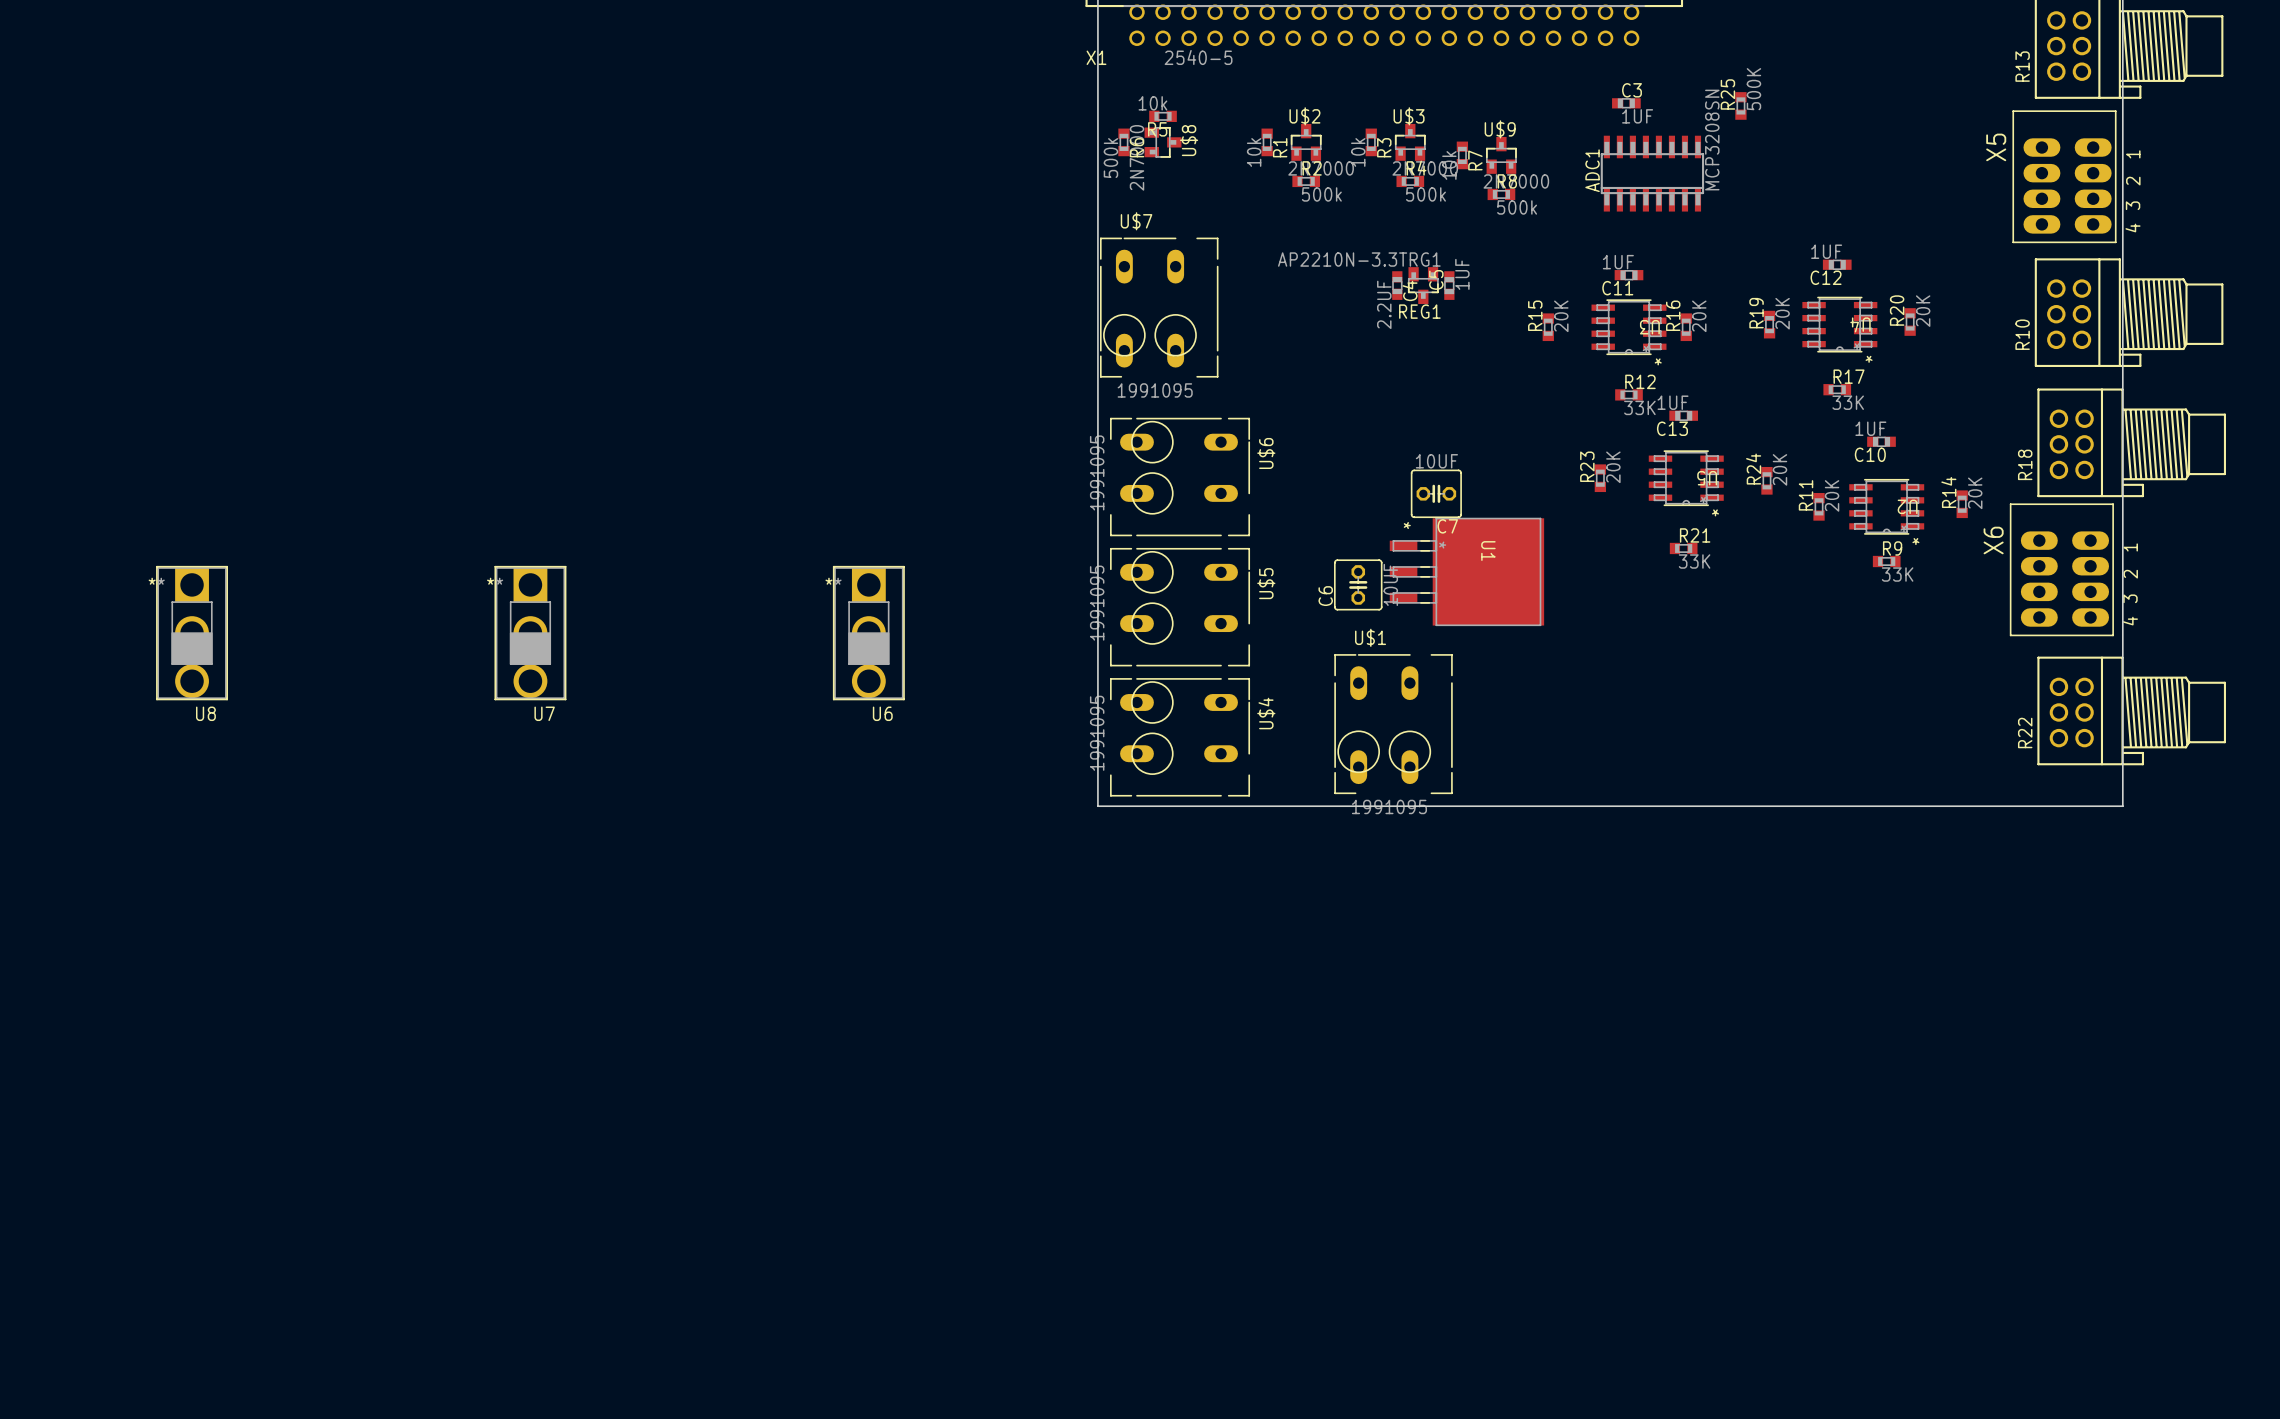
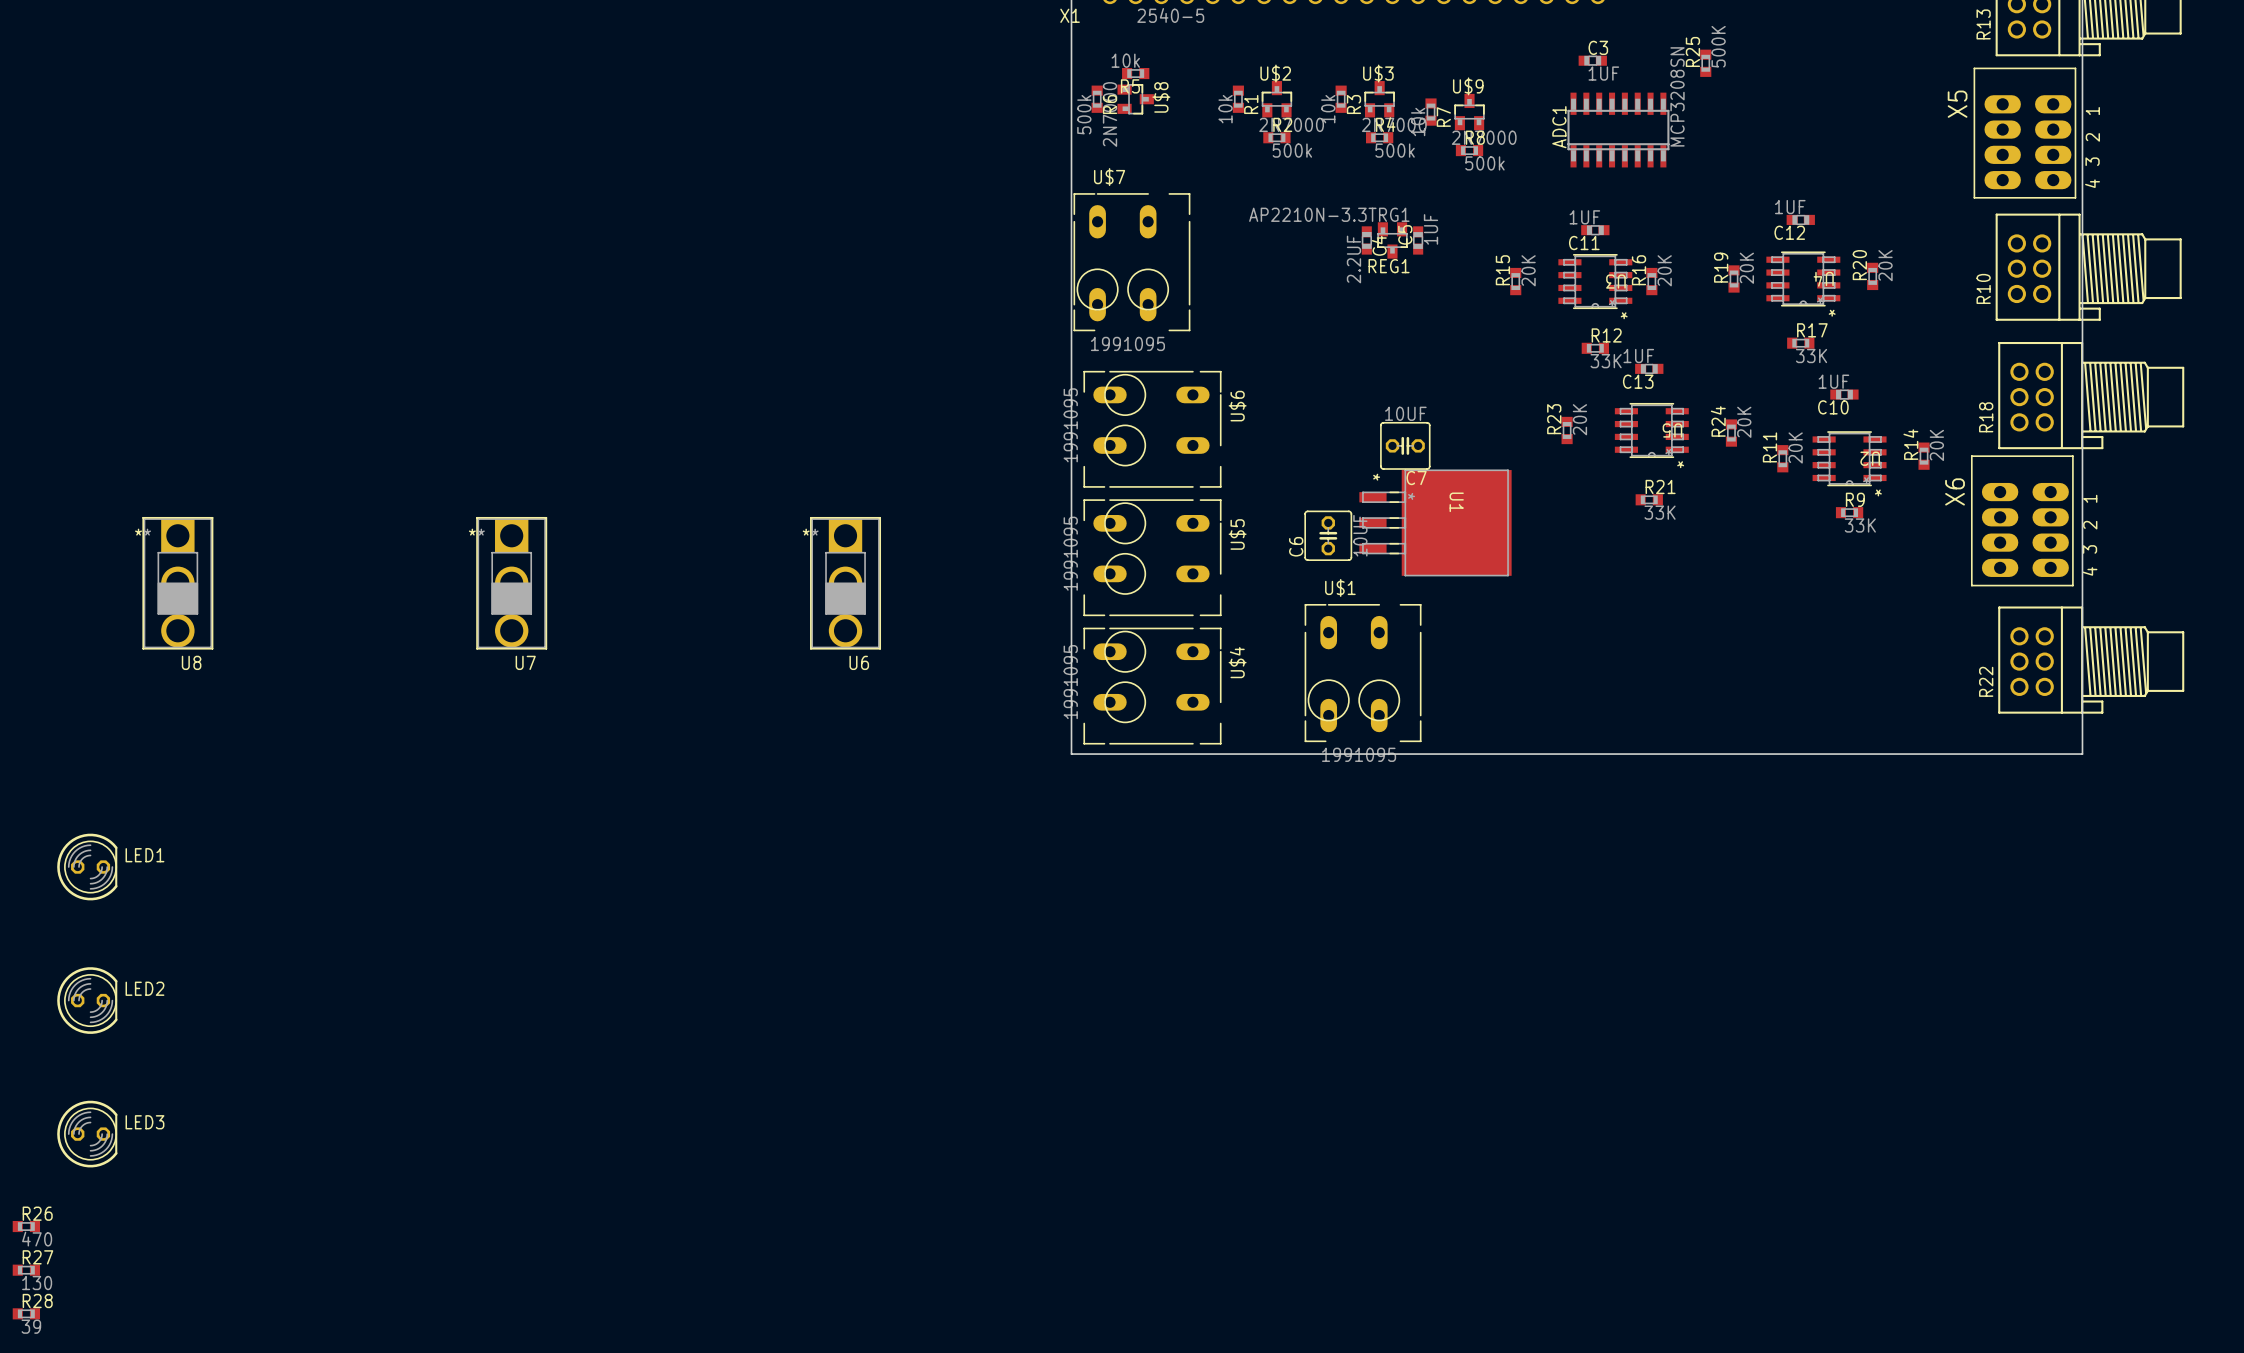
LED1: none -> (87, 867)
LED2: none -> (87, 1000)
LED3: none -> (87, 1134)
R26: none -> 470 (26, 1226)
R27: none -> 130 (26, 1270)
R28: none -> 39 (26, 1313)

